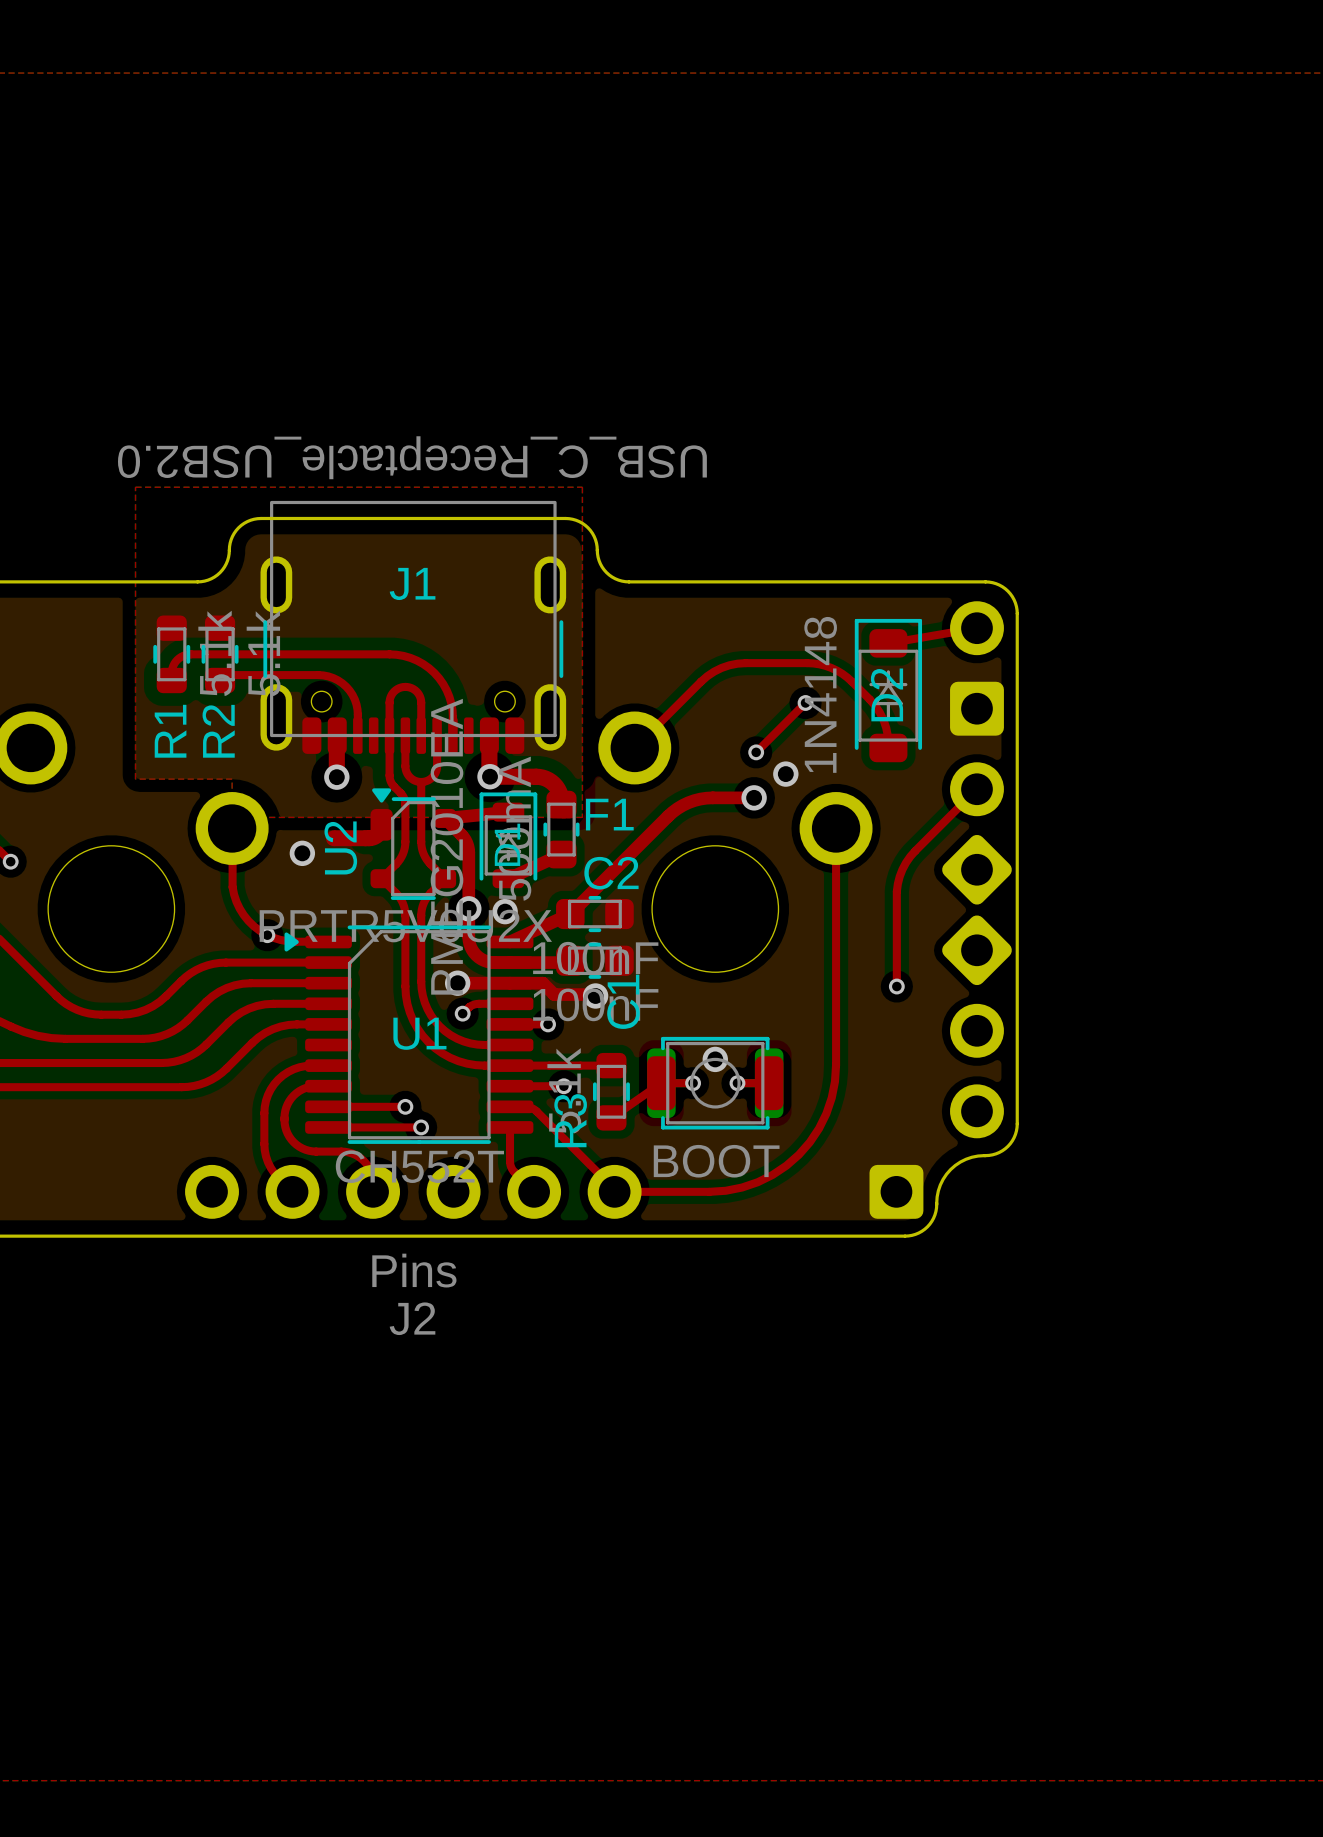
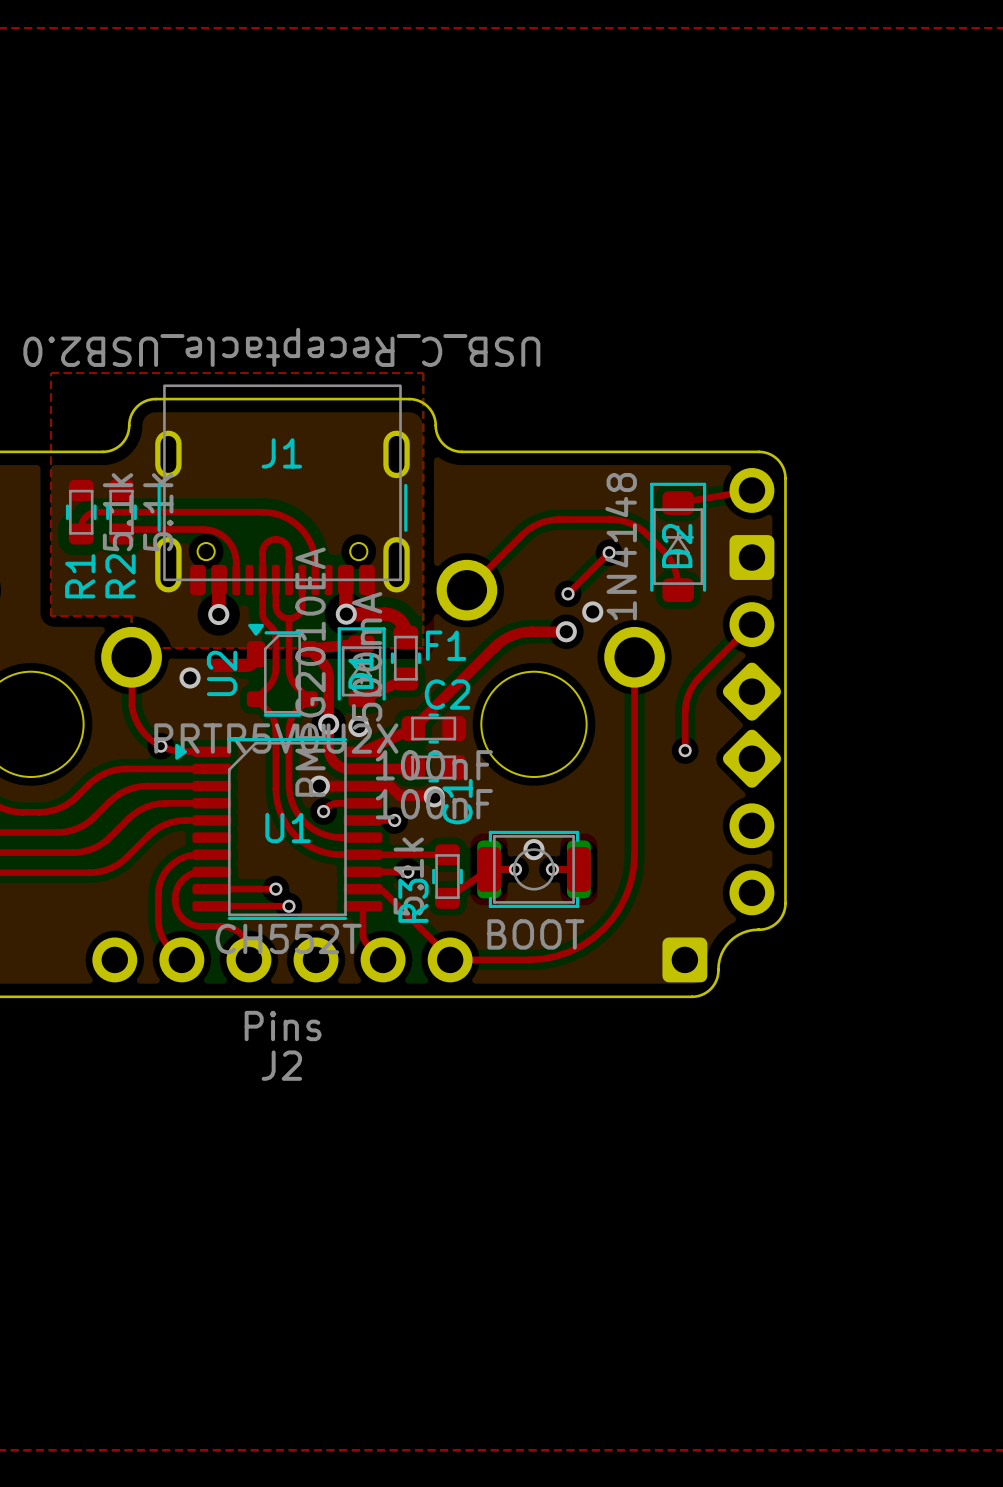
top track: (896, 940) (896, 986) -> none
via position: (896, 986) -> (685, 750)

